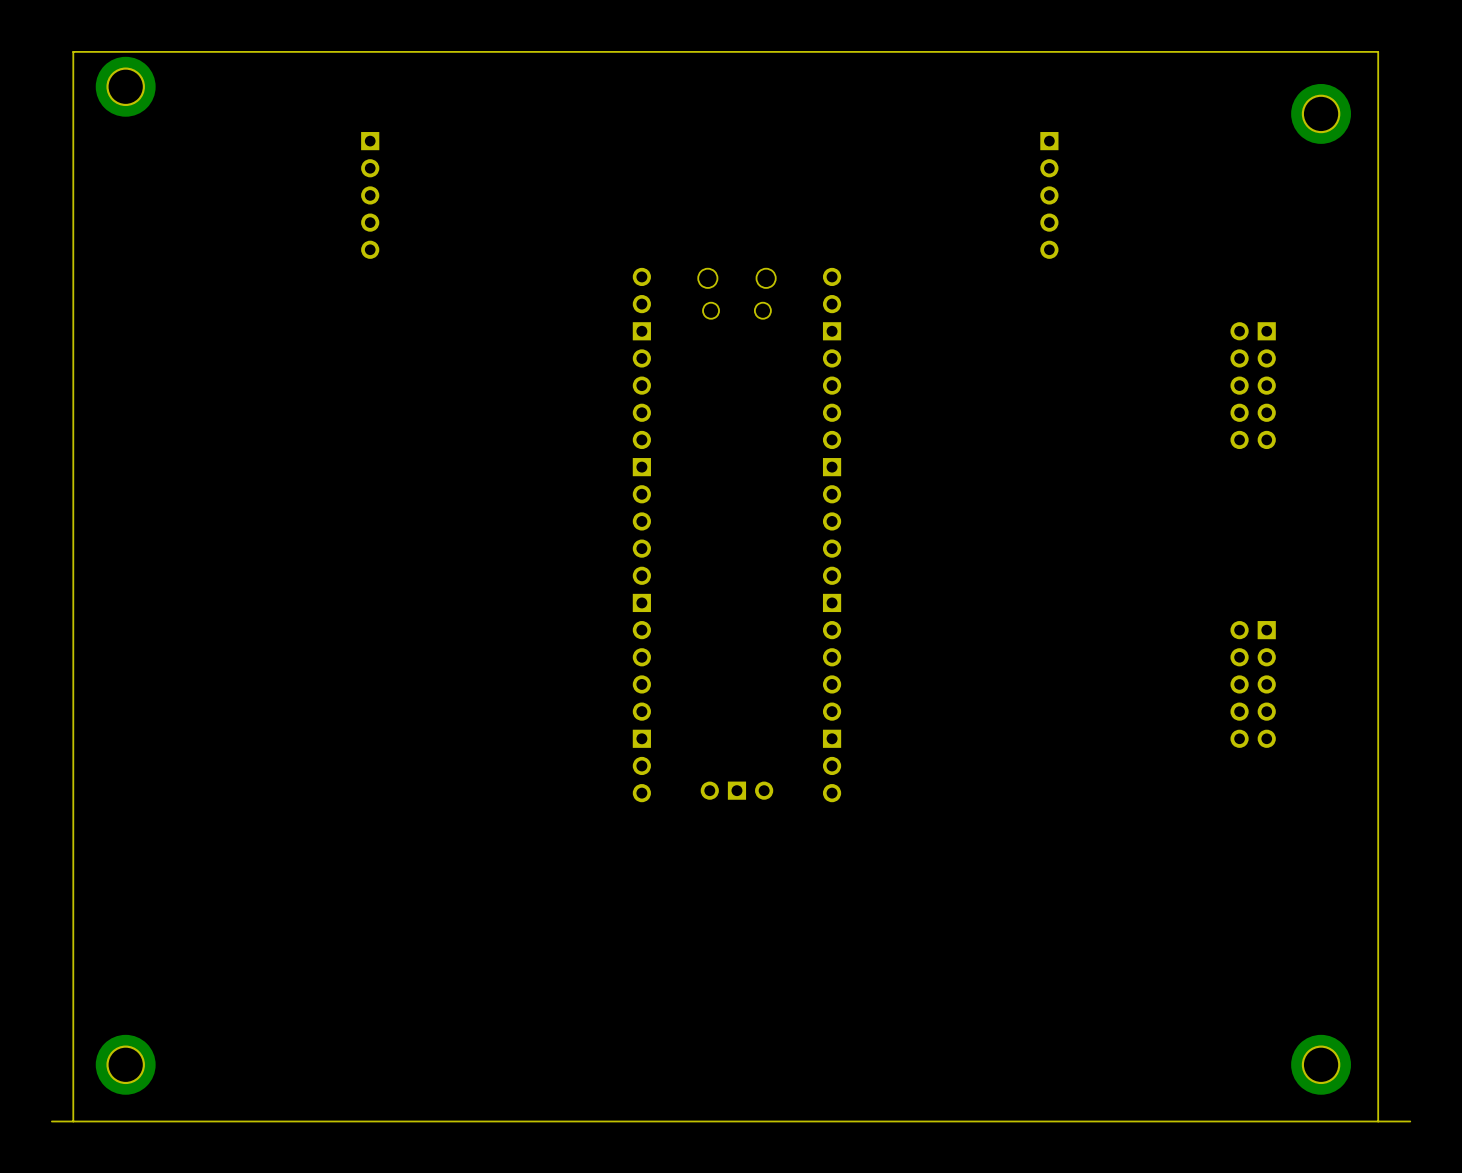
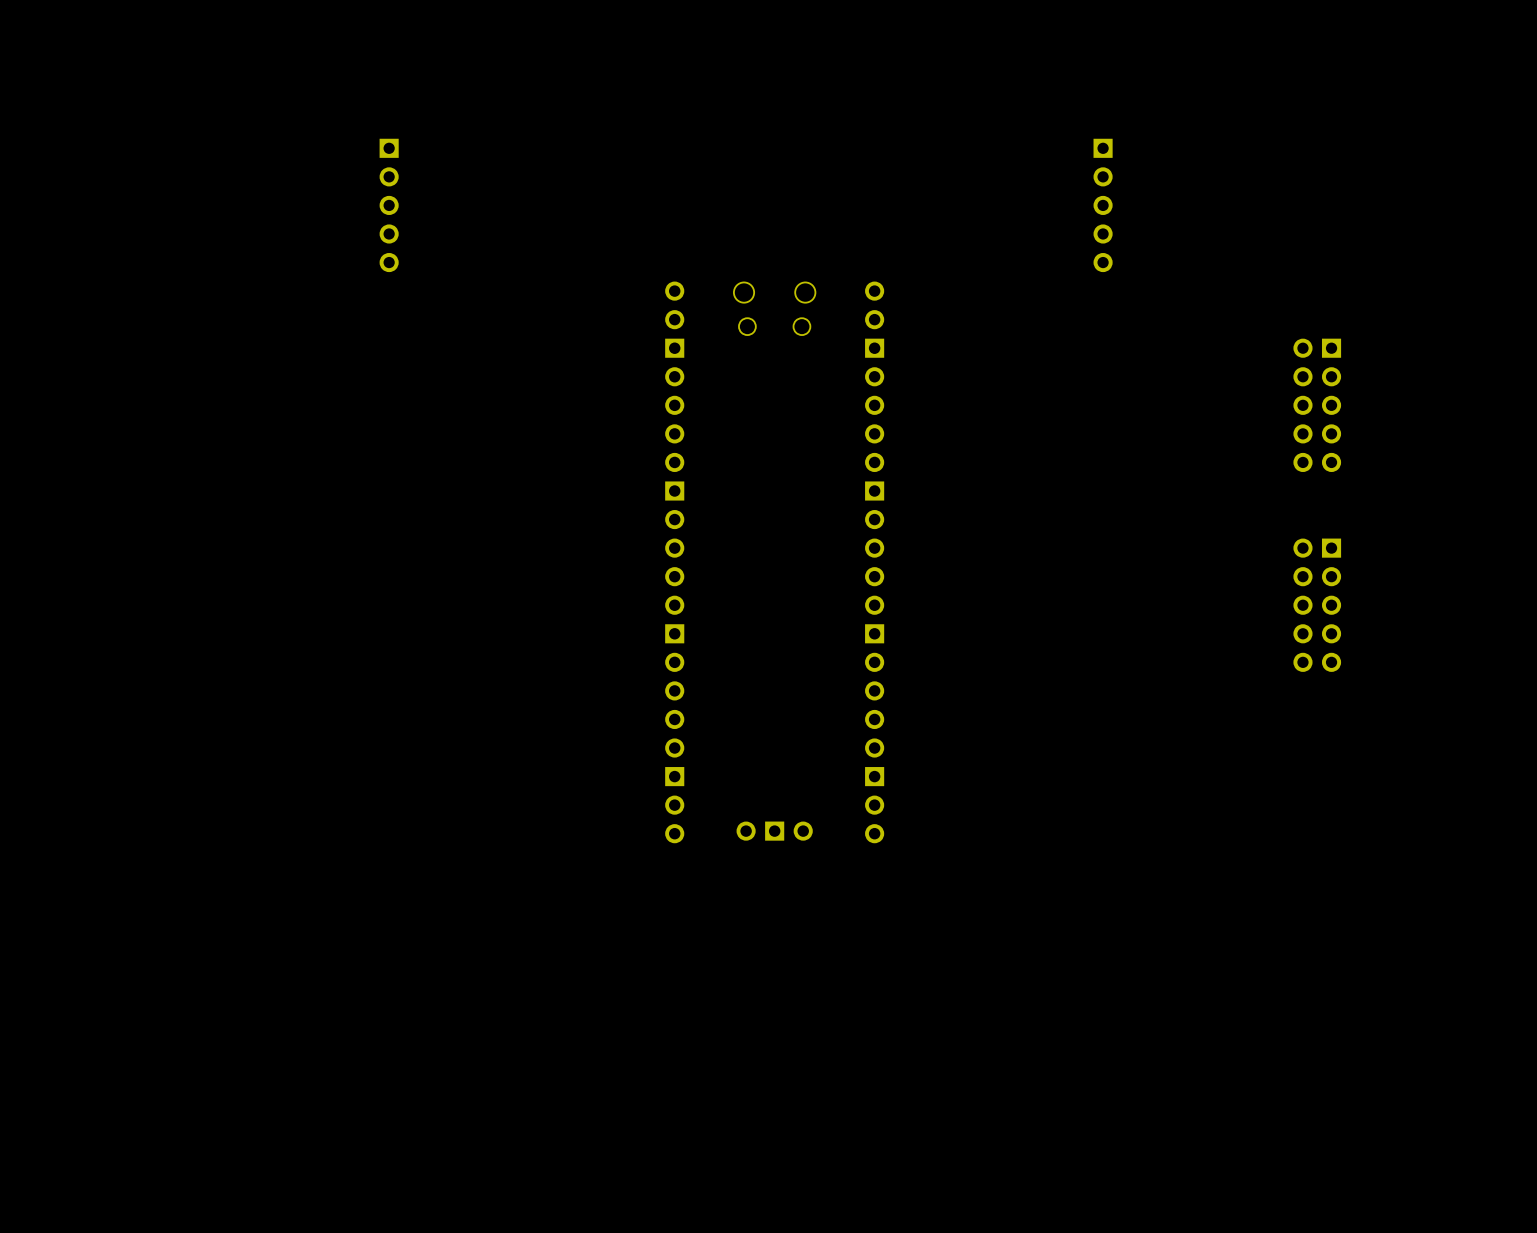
part: (125, 86) -> none
part: (1321, 113) -> none
part position: (1253, 684) -> (1317, 605)
part: (125, 1064) -> none
part: (1321, 1064) -> none
board edge: (1378, 1121) (1378, 51) (73, 51) (73, 1121) -> none
board edge: (1410, 1121) (51, 1121) -> none

